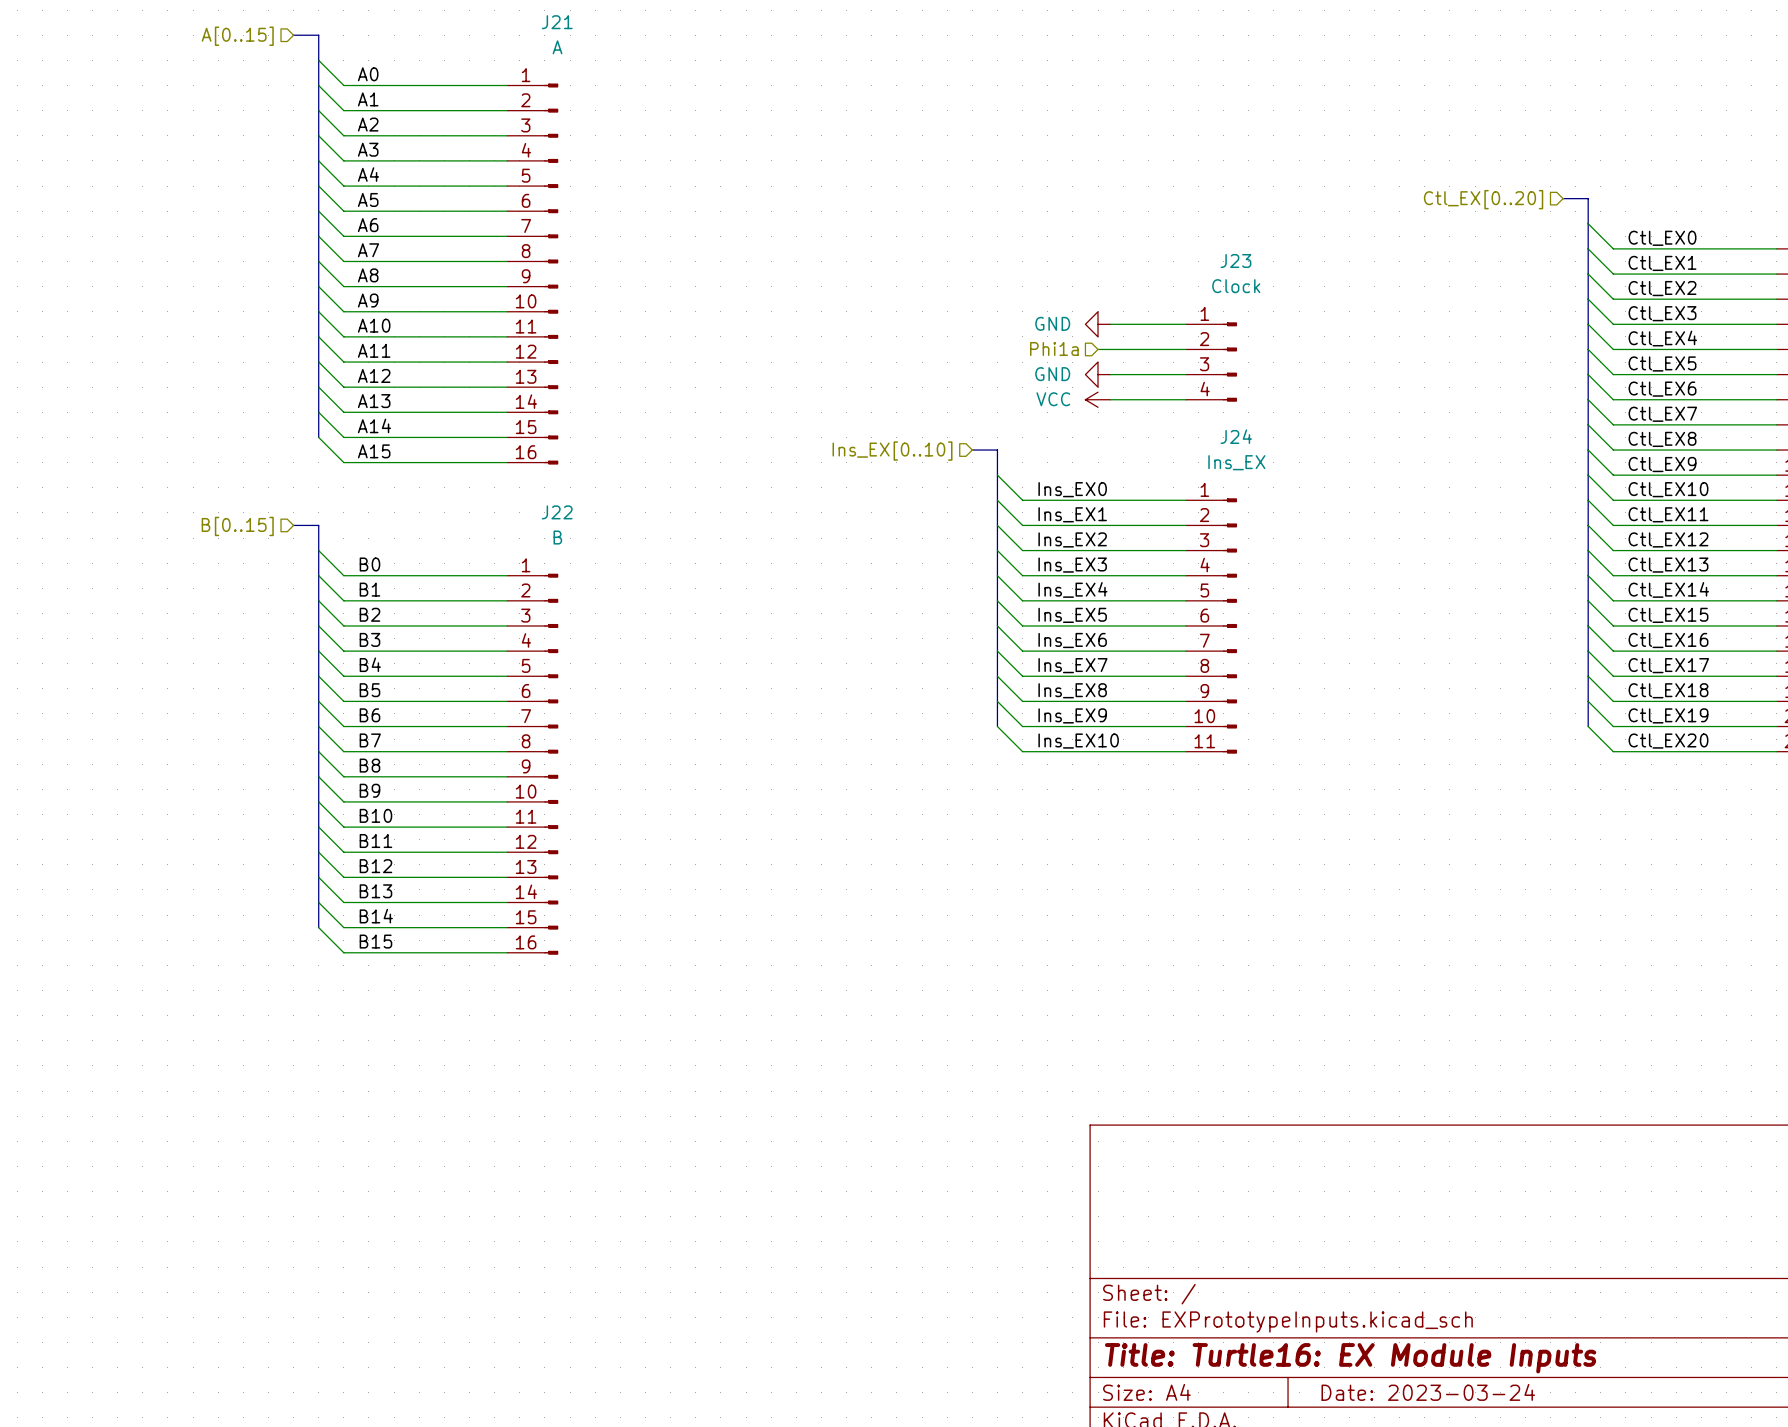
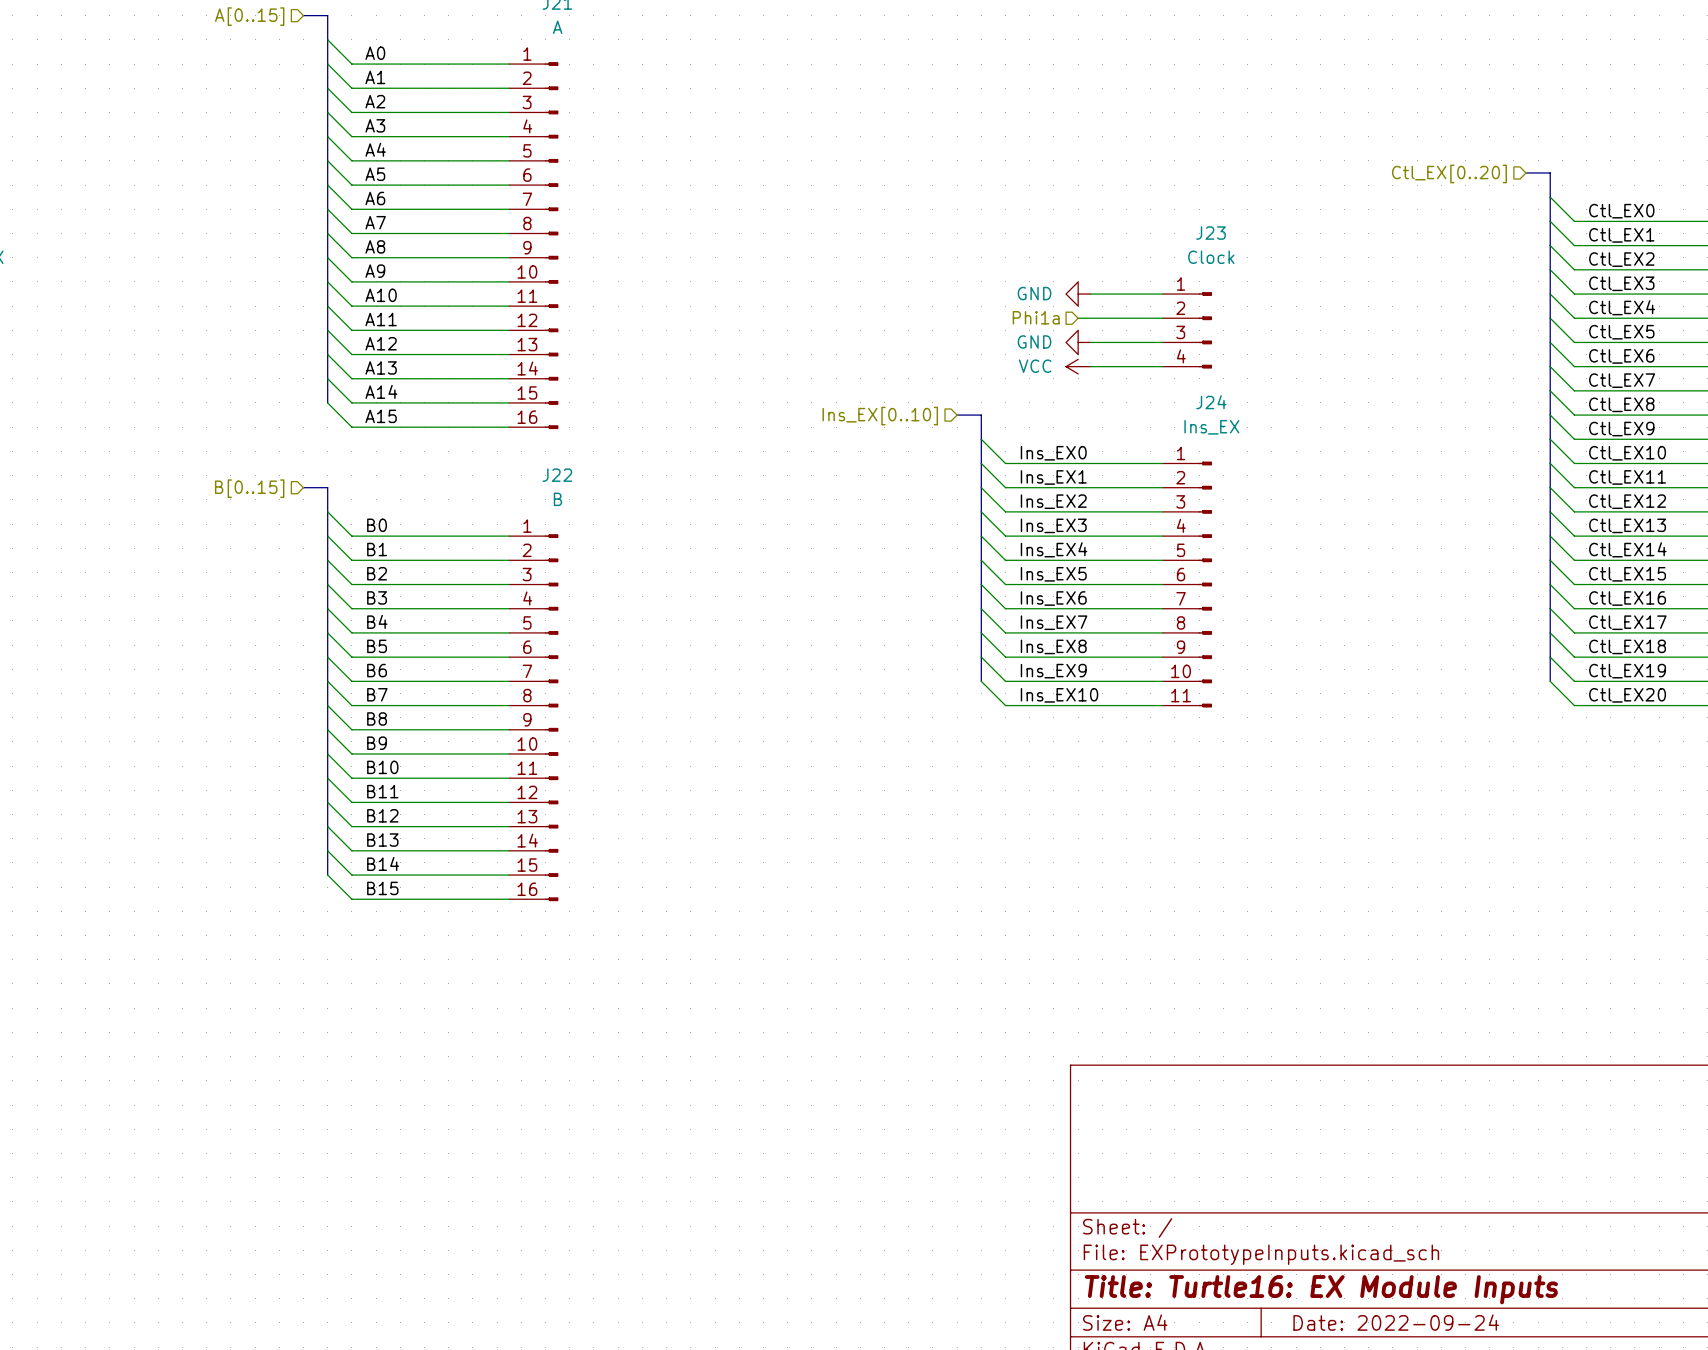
title block: Date: 2023-03-24 (1428, 1392) -> Date: 2022-09-24 (1396, 1322)

